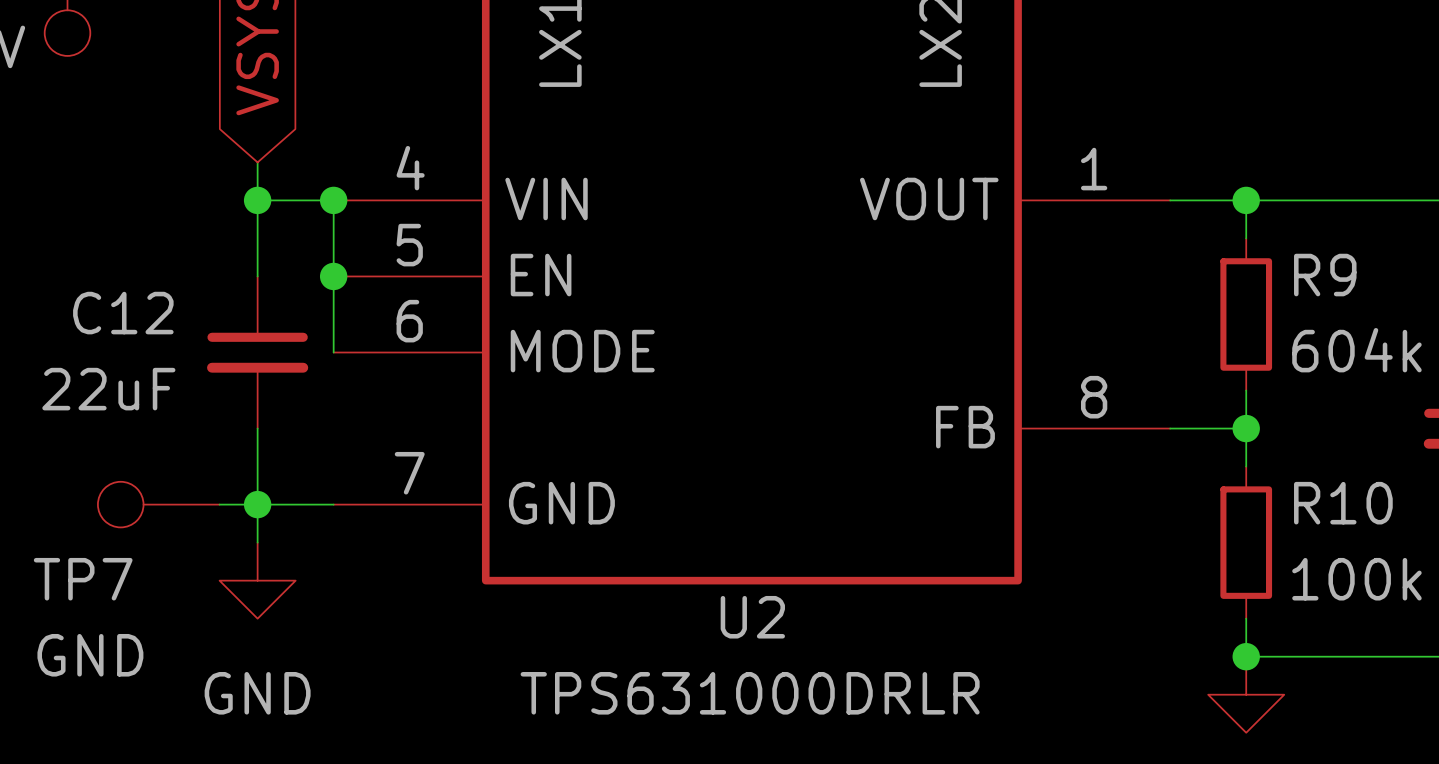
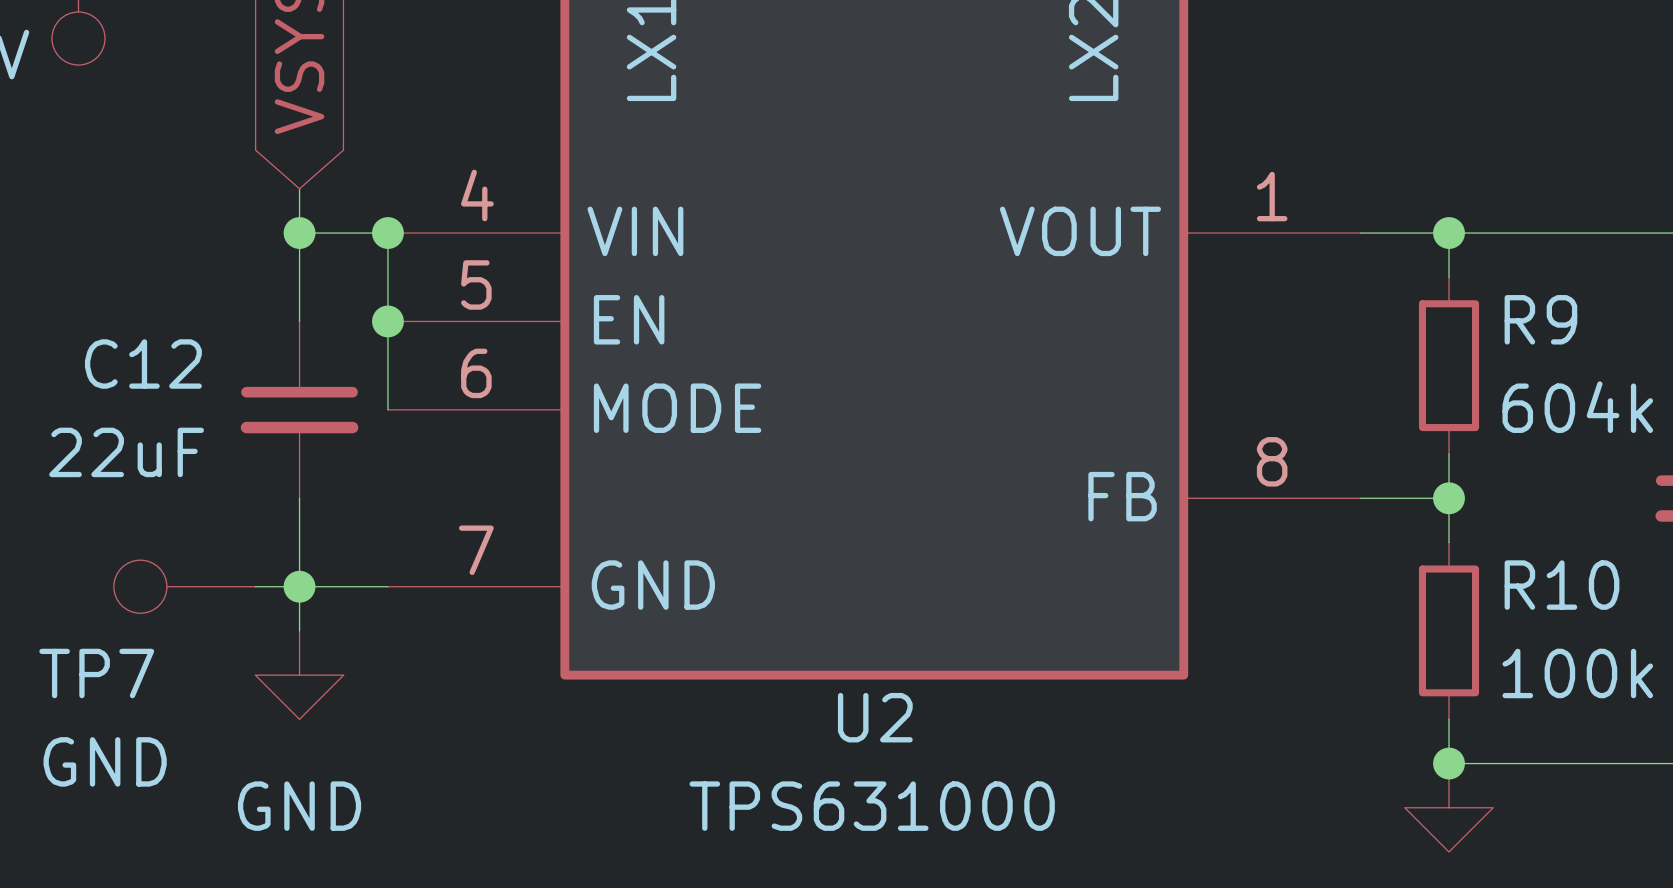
U2 value: TPS631000DRLR (750, 693) -> TPS631000 (872, 806)

